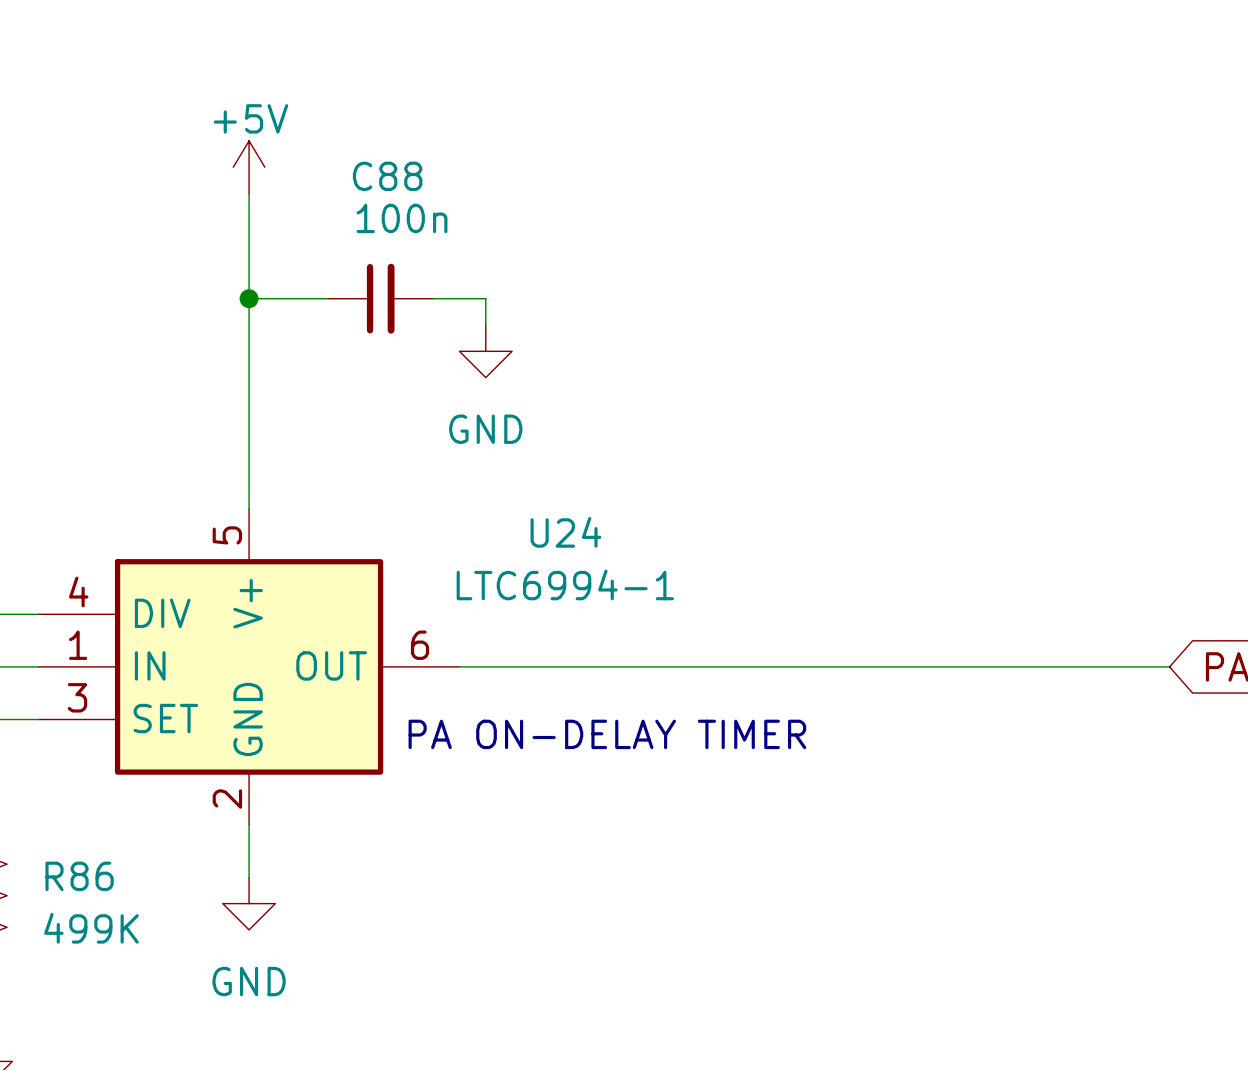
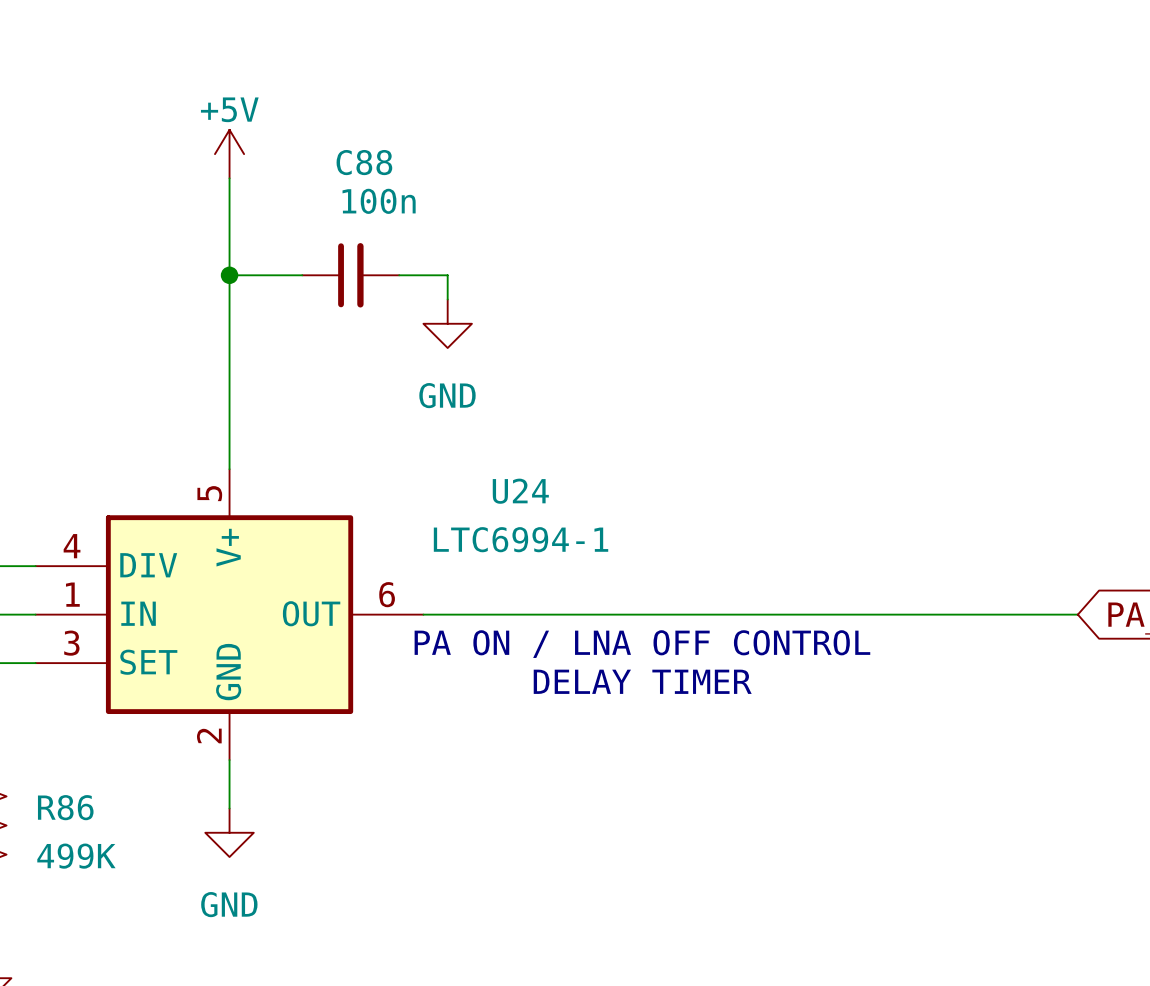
text: none -> PA ON / LNA OFF CONTROL (642, 644)
text: PA ON-DELAY TIMER (607, 734) -> DELAY TIMER (642, 681)

